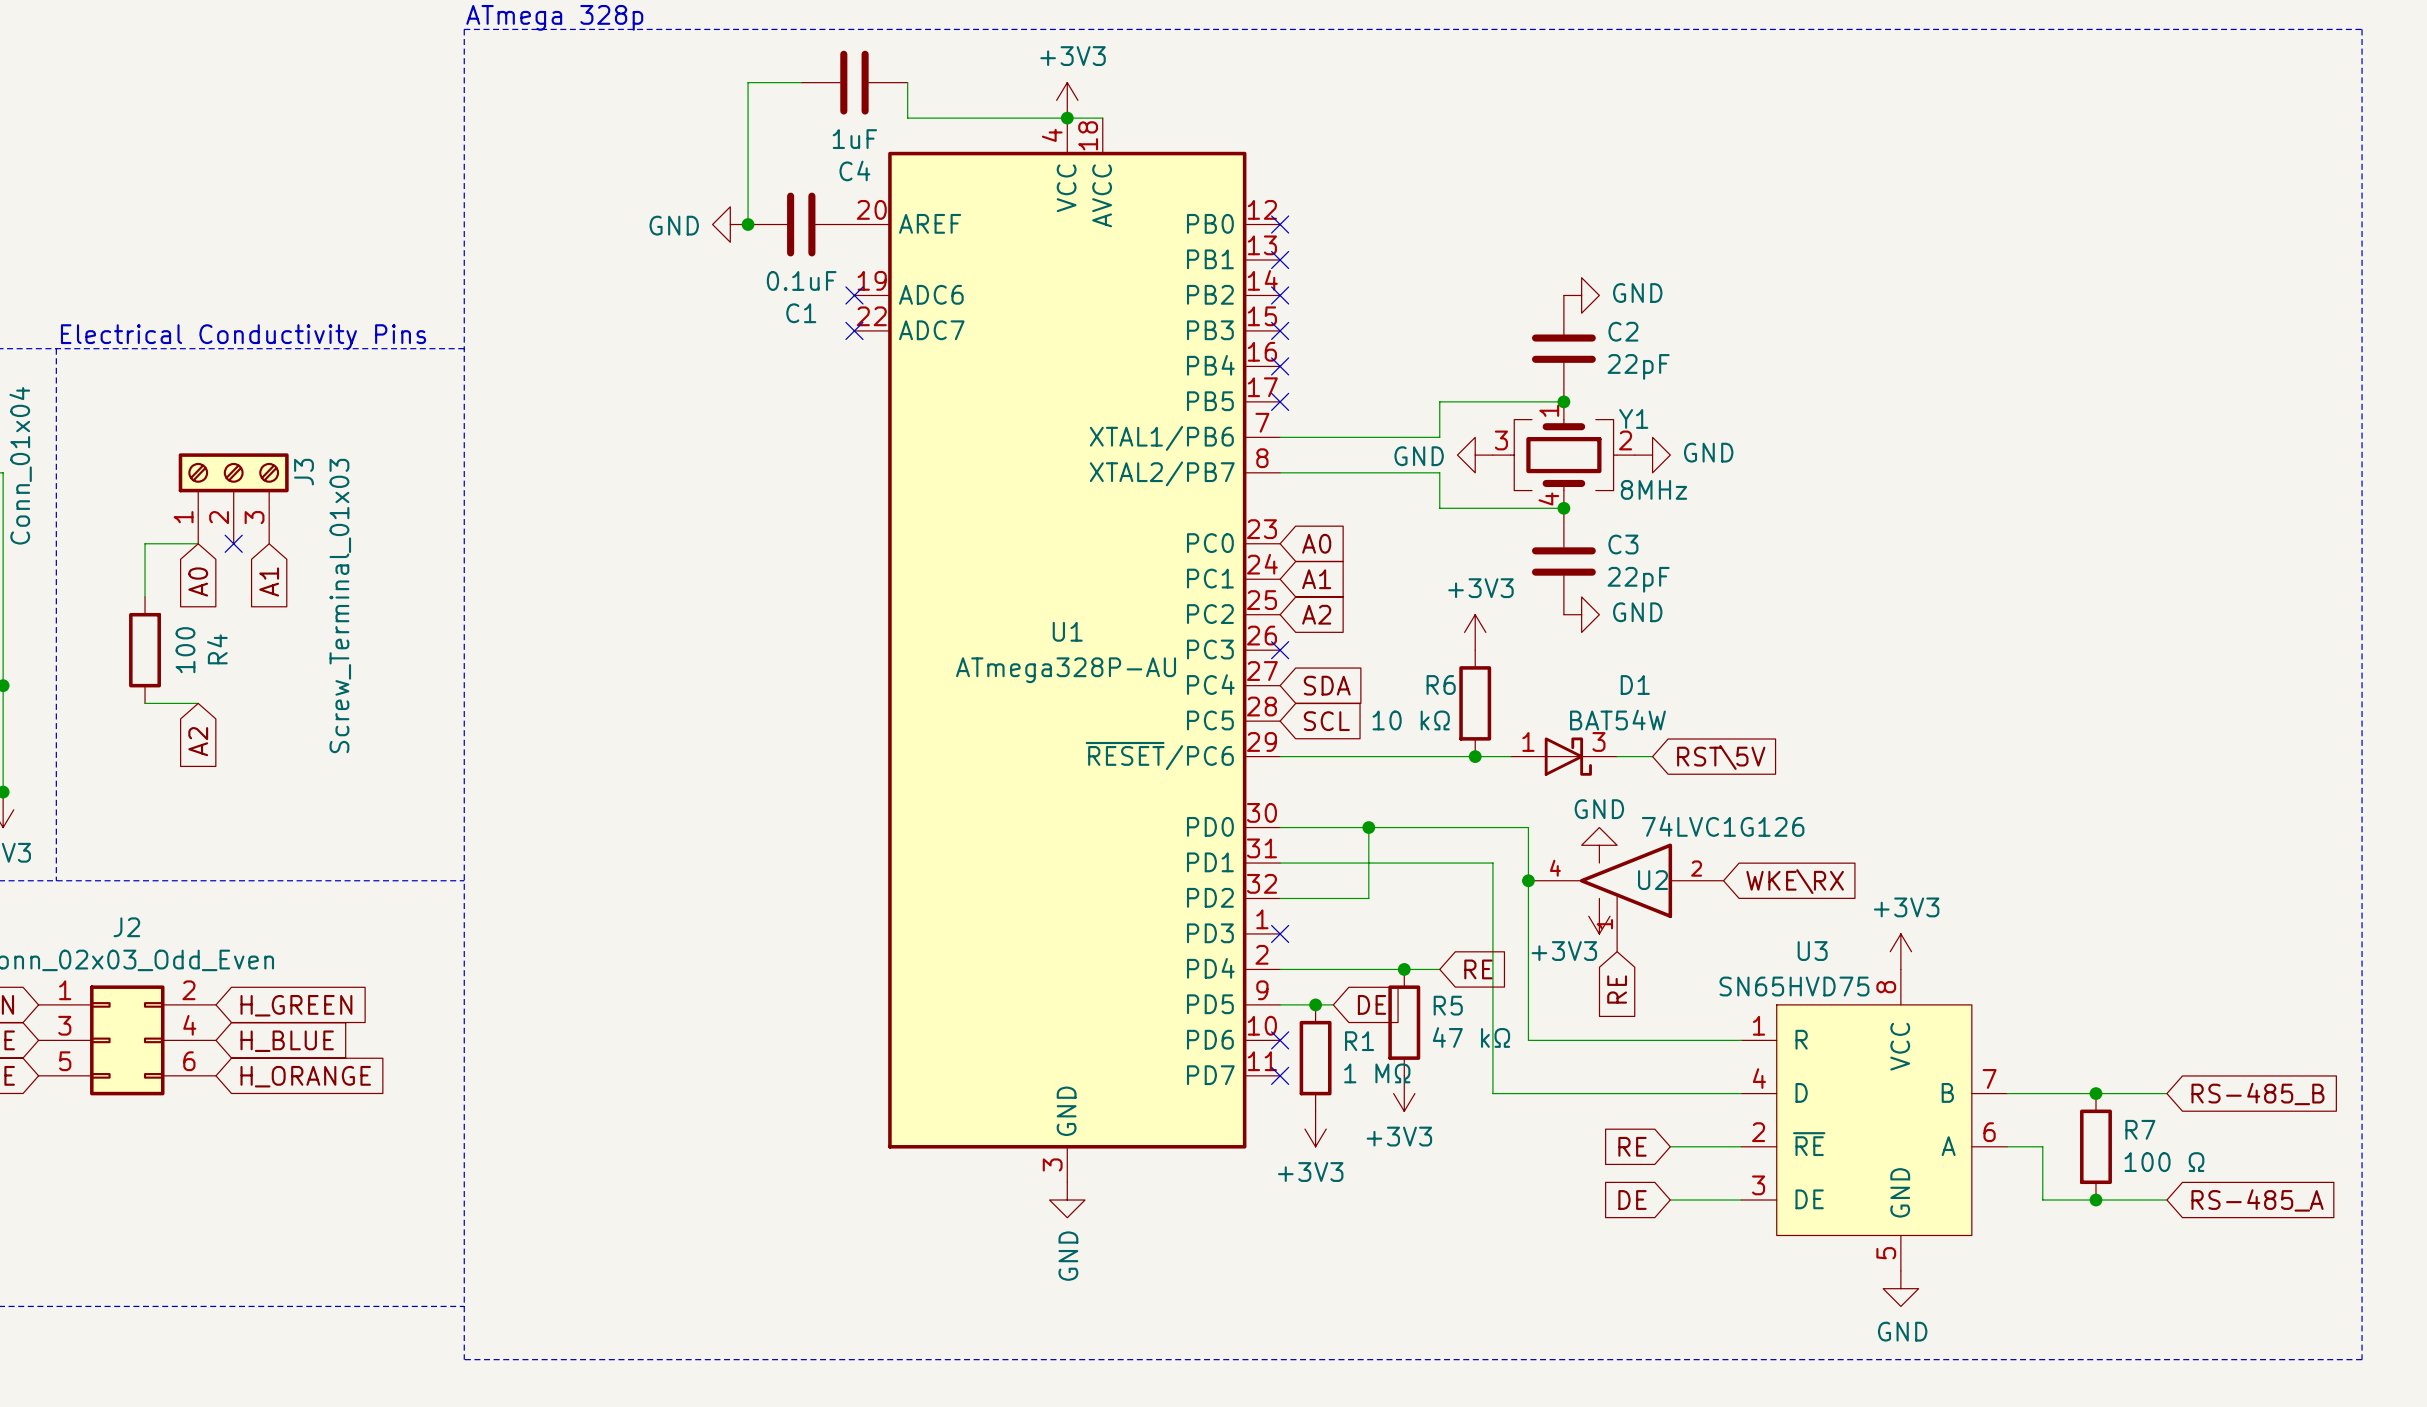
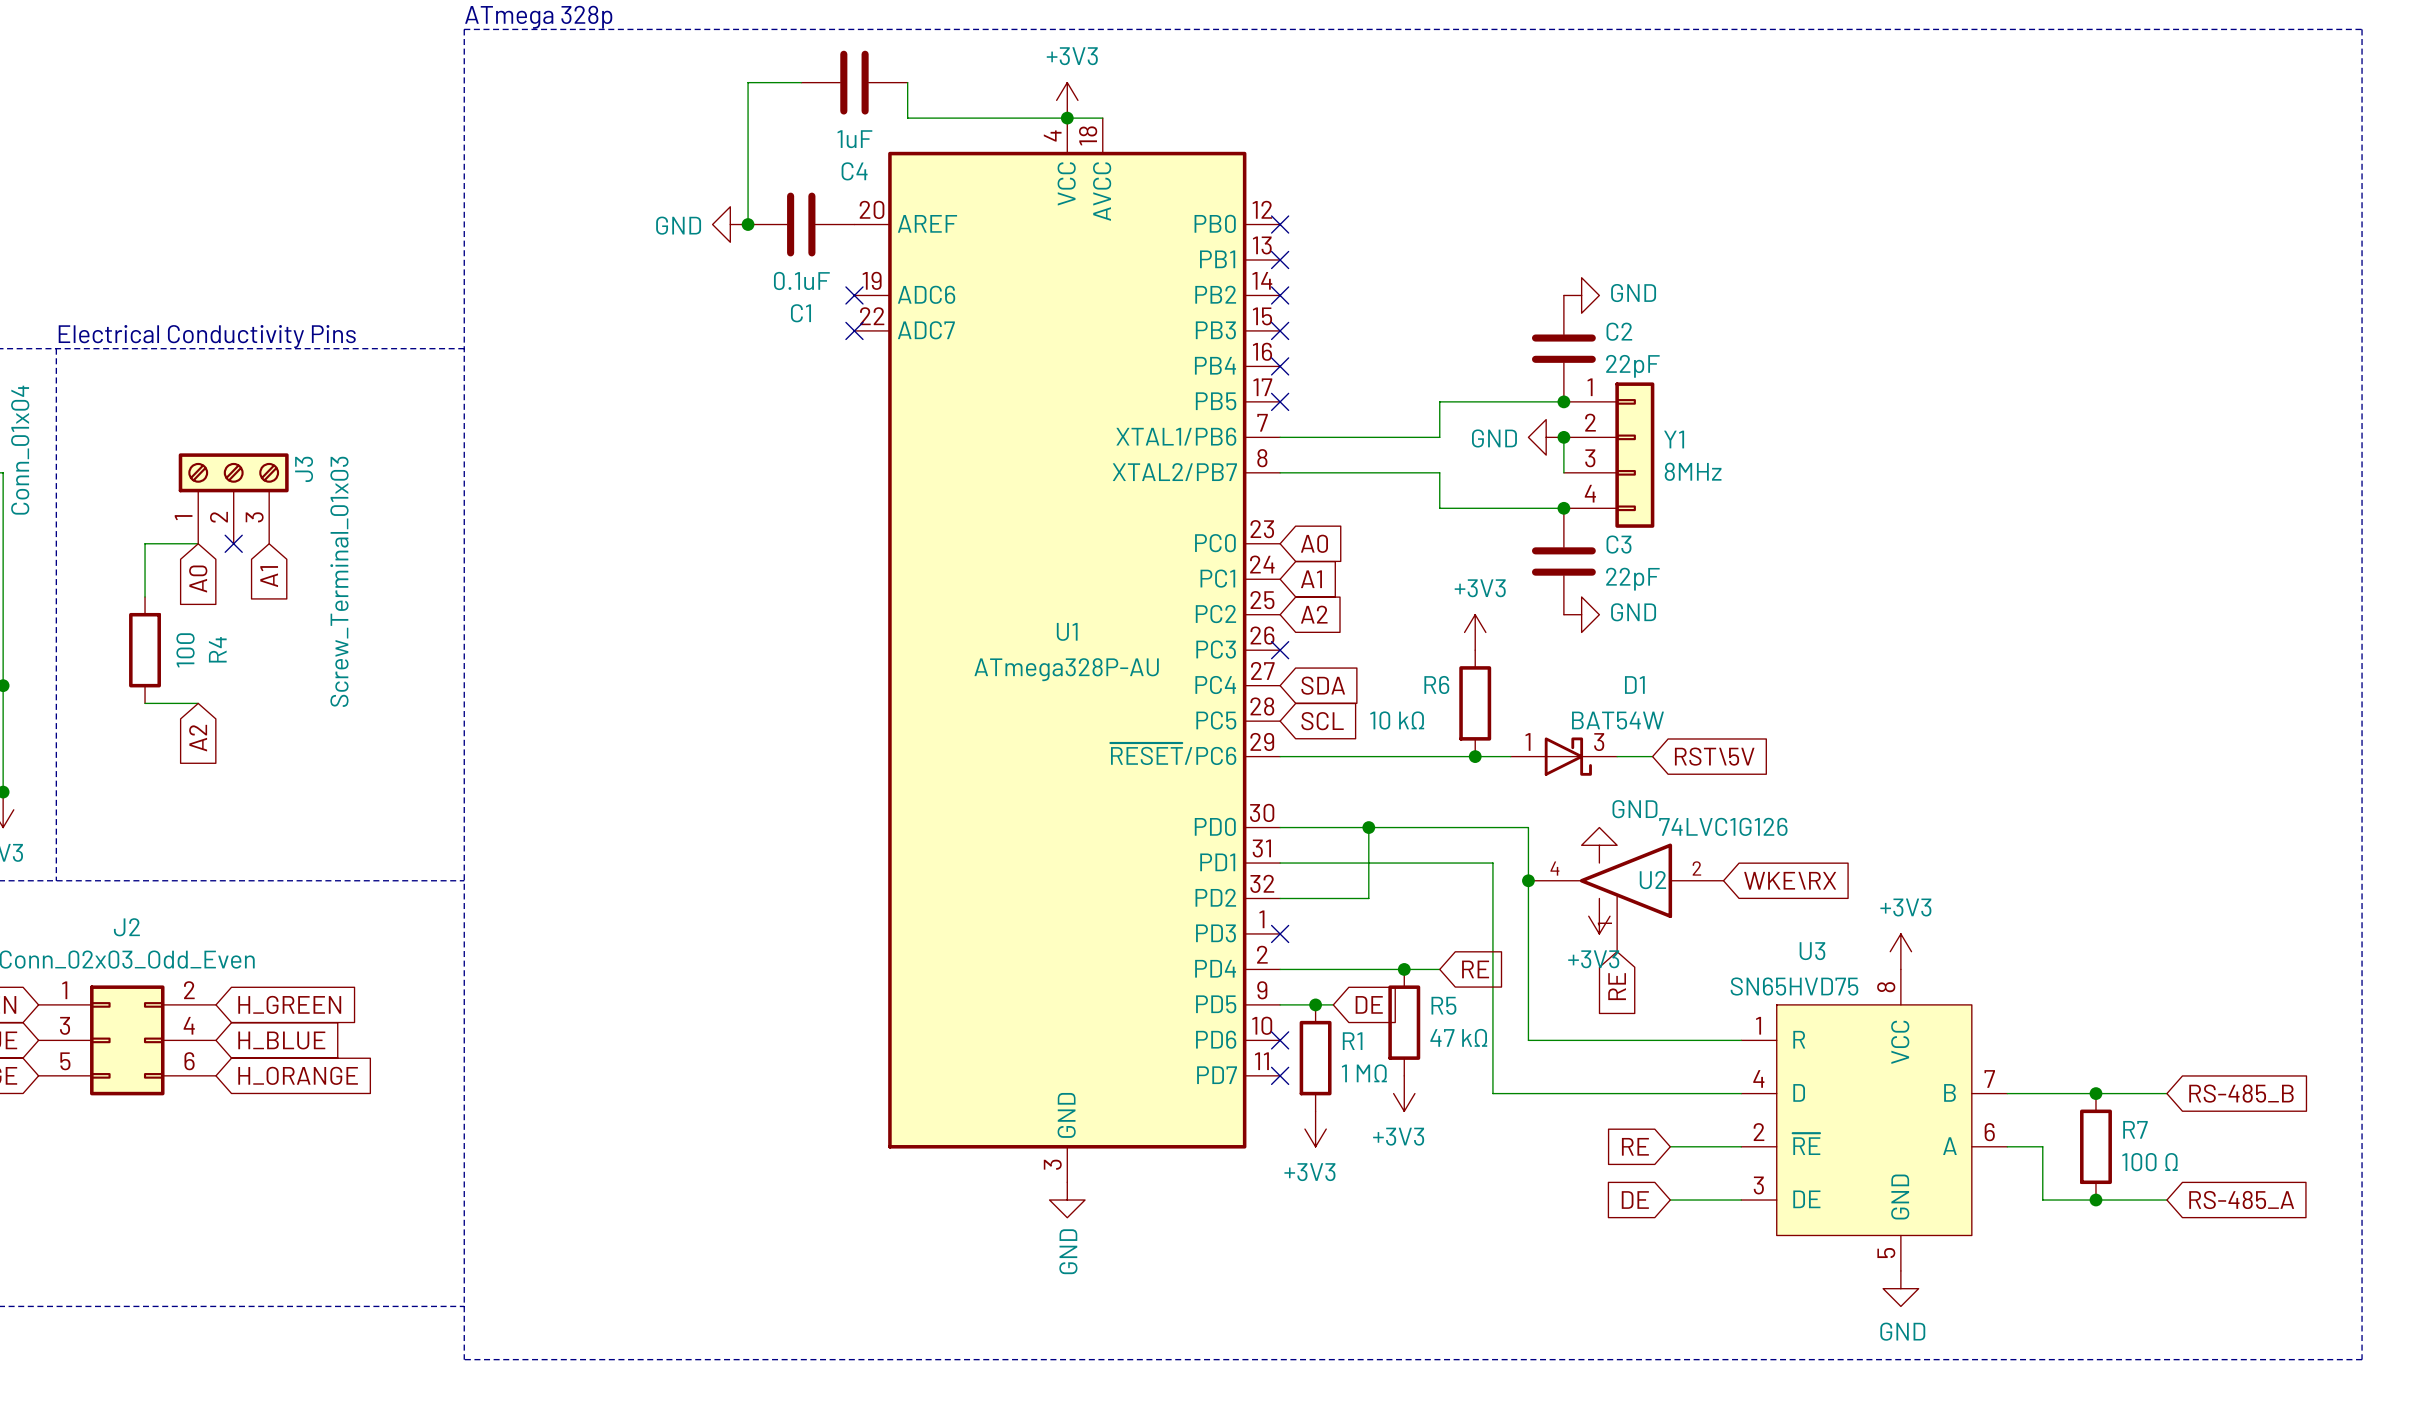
Y1 symbol: [1492, 401, 1635, 509] -> [1563, 382, 1655, 528]
power symbol: none -> GND (1546, 437)
wire: none -> (1563, 437) (1563, 472)
junction: none -> (1563, 437)
power symbol: GND (1475, 455) -> none
power symbol: GND (1652, 455) -> none
power symbol text position: GND (1599, 809) -> GND (1634, 809)
power symbol text position: +3V3 (1564, 951) -> +3V3 (1593, 959)

